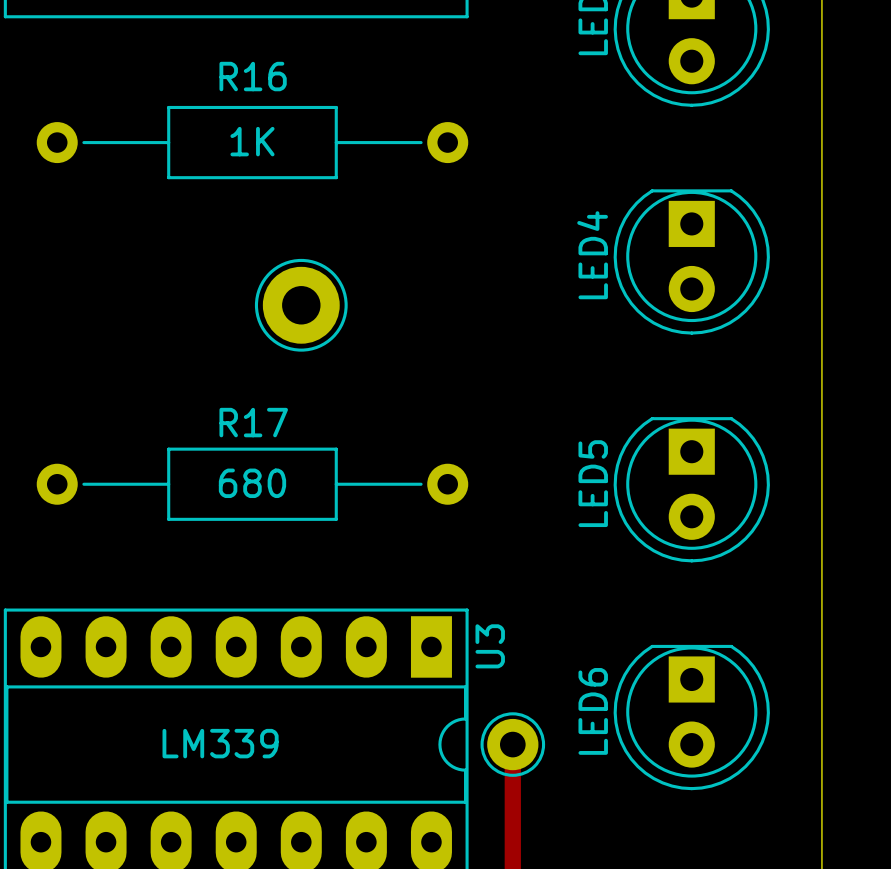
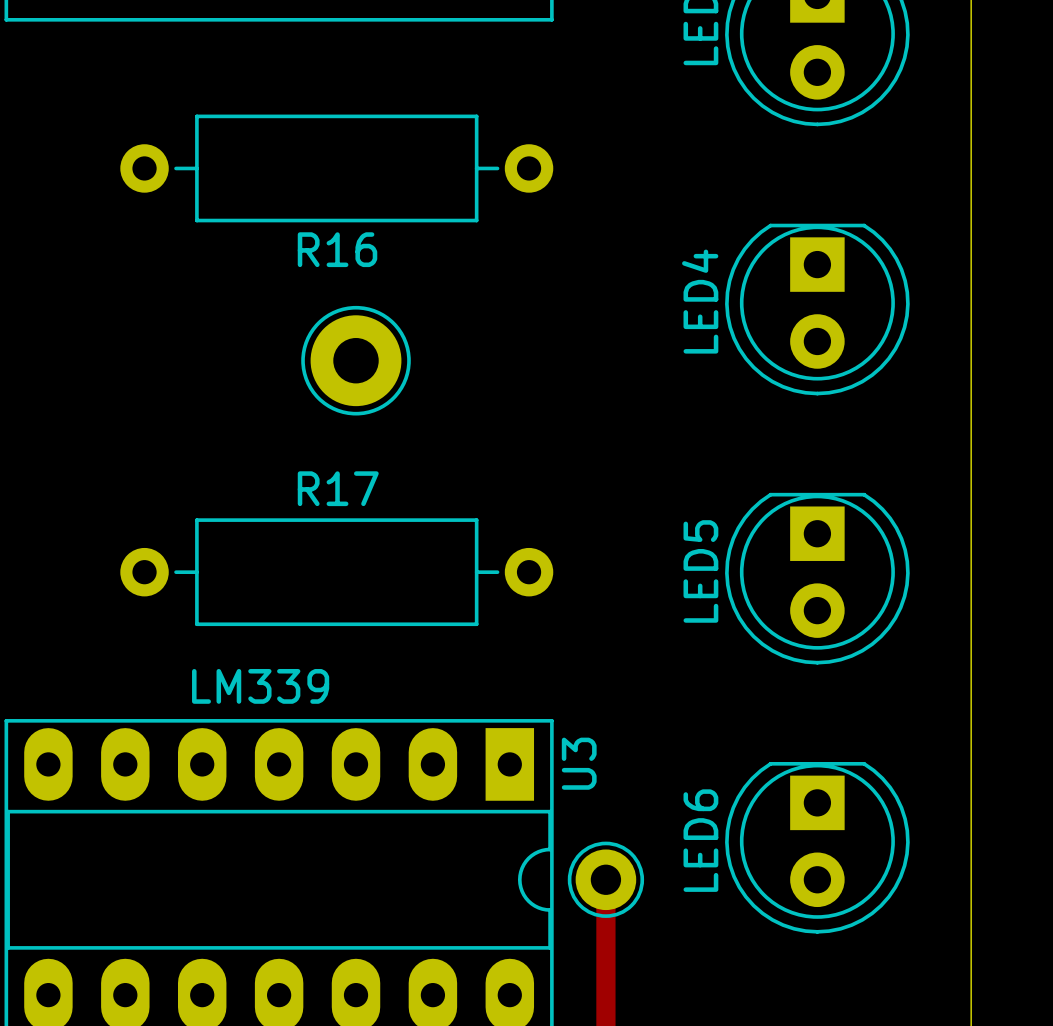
R16 name position: R16 (253, 76) -> R16 (337, 249)
R16 footprint: [36, 105, 469, 180] -> [120, 114, 554, 223]
R16 value: 1K (252, 141) -> none
R17 footprint: [36, 447, 469, 521] -> [120, 518, 554, 627]
R17 value: 680 (252, 483) -> none
U3 value position: LM339 (220, 743) -> LM339 (260, 686)

